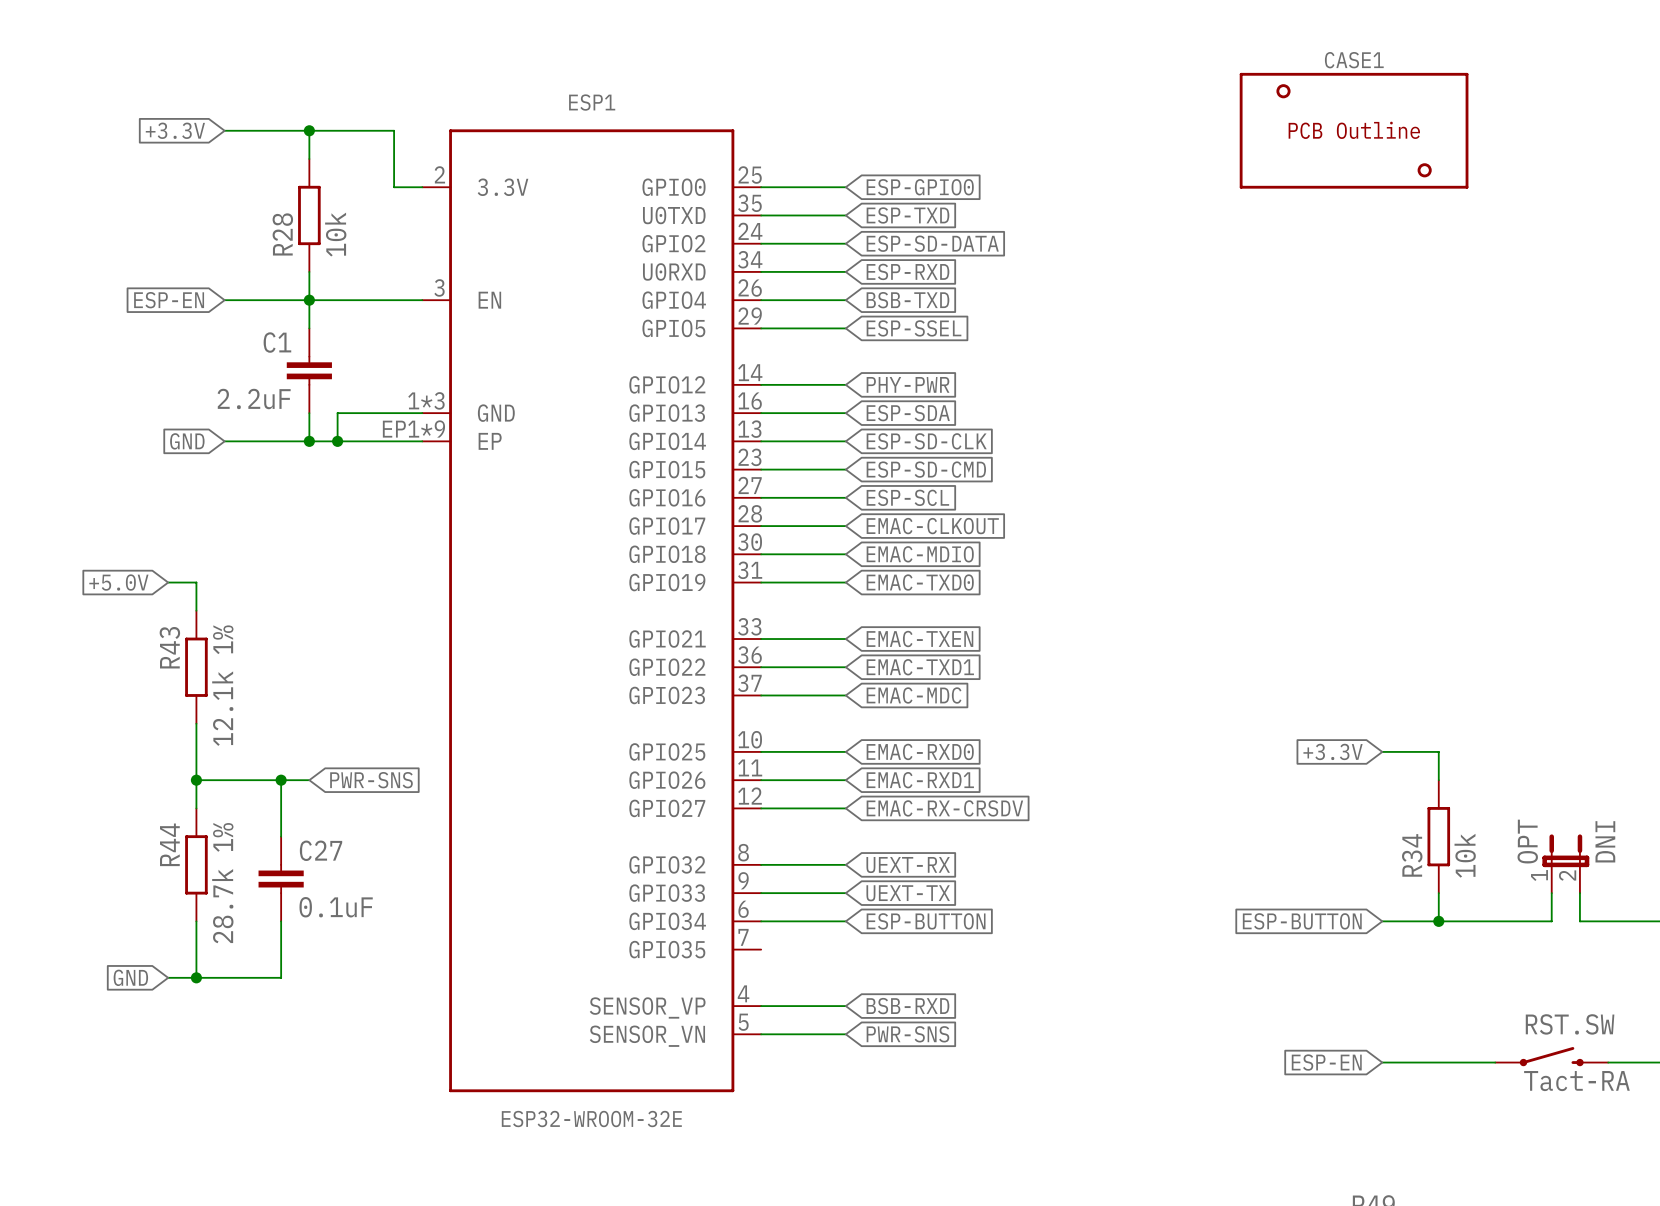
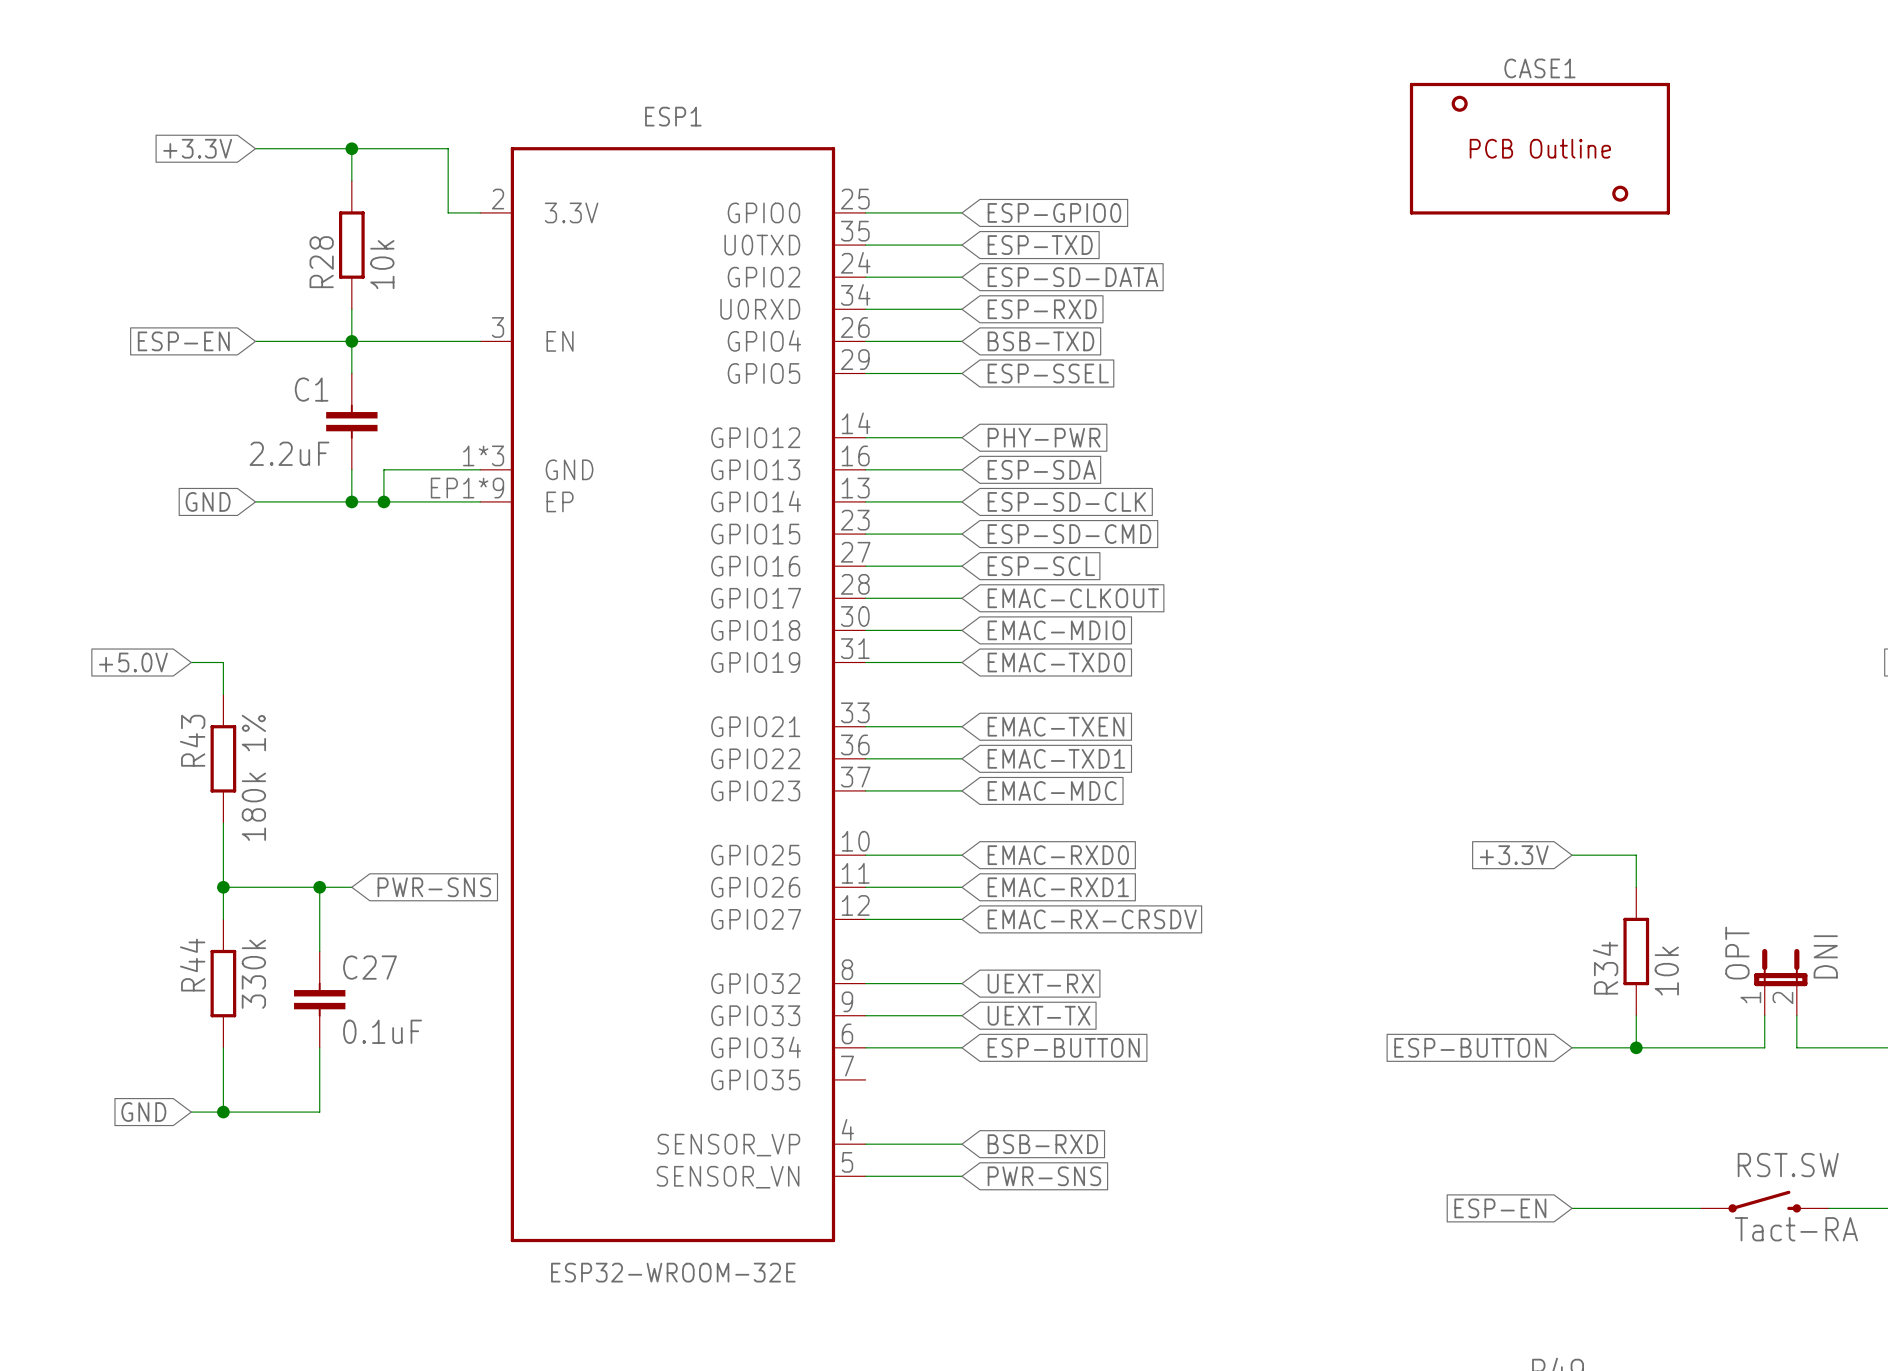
R43 value: 12.1k 1% (222, 685) -> 180k 1% (253, 777)
R44 value: 28.7k 1% (222, 883) -> 330k (253, 974)

